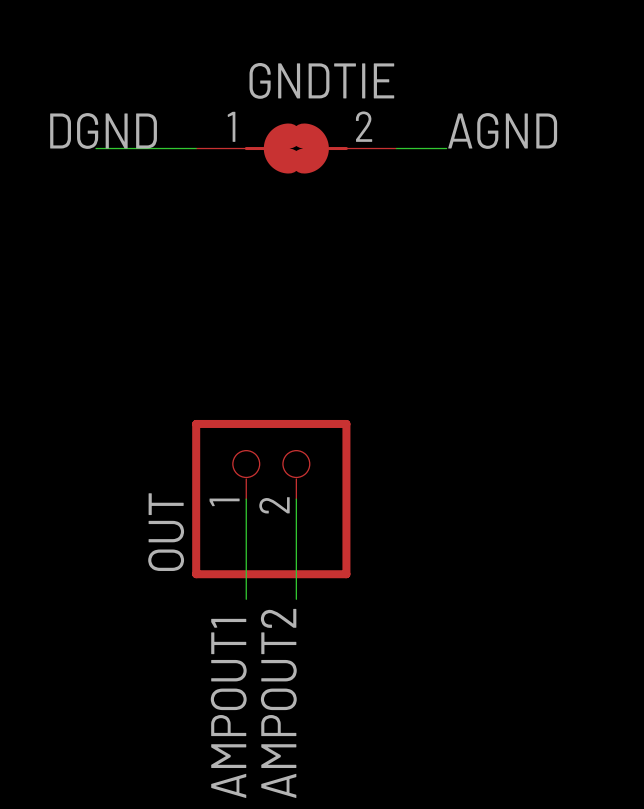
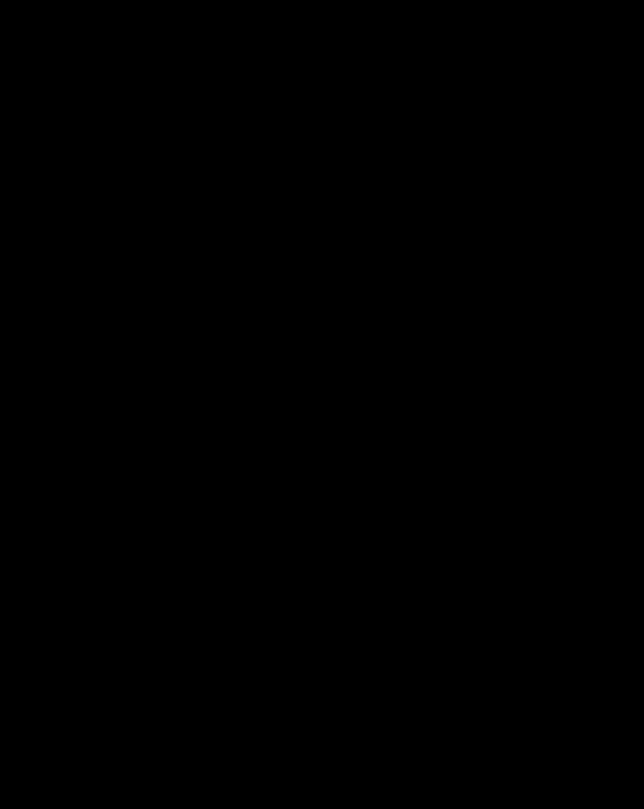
label: DGND (103, 130) -> none
label: AGND (502, 130) -> none
wire: (96, 148) (196, 148) -> none
GNDTIE: (296, 148) -> none
wire: (396, 148) (446, 148) -> none
wire: (246, 499) (246, 599) -> none
OUT: (271, 499) -> none
wire: (296, 499) (296, 599) -> none
label: AMPOUT2 (278, 703) -> none
label: AMPOUT1 (228, 708) -> none

